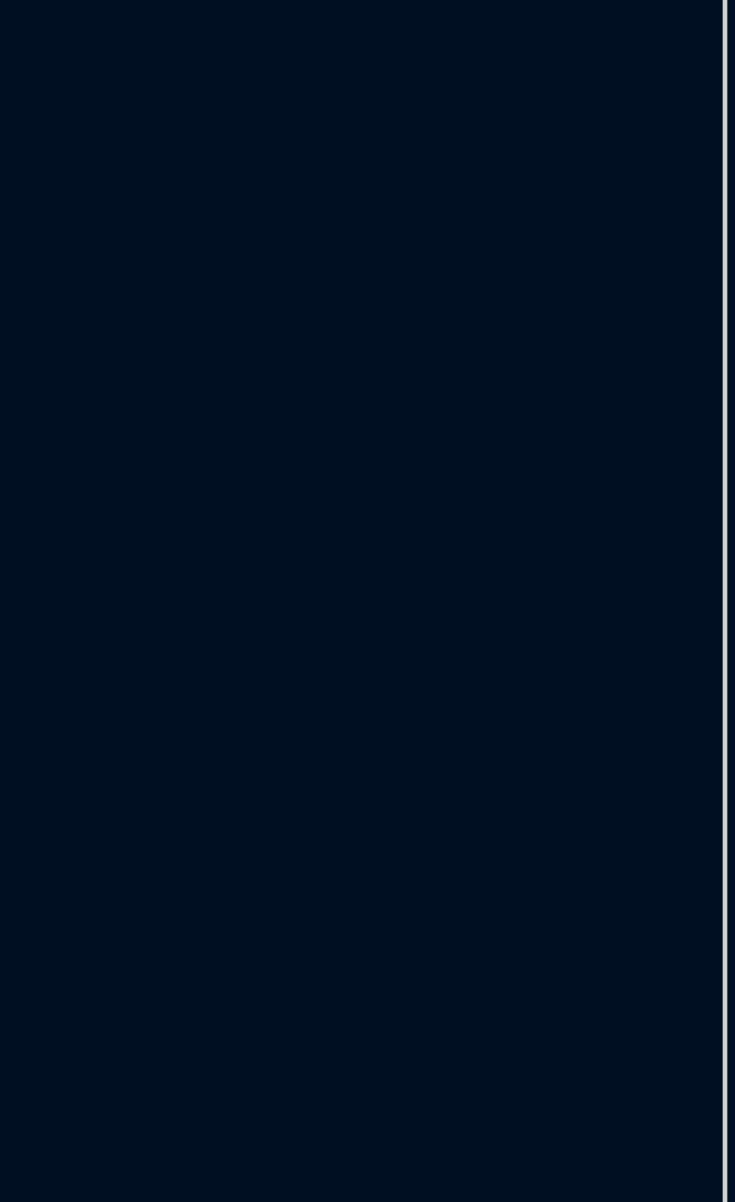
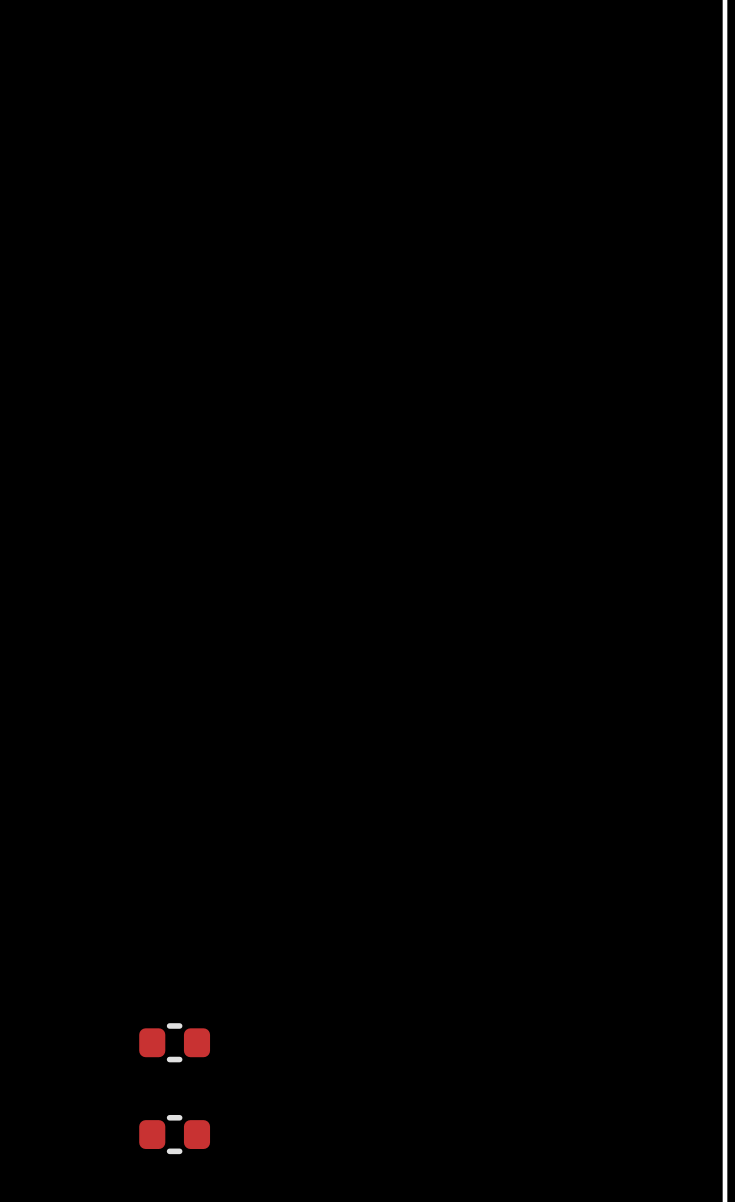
part: none -> (174, 1042)
part: none -> (174, 1134)

